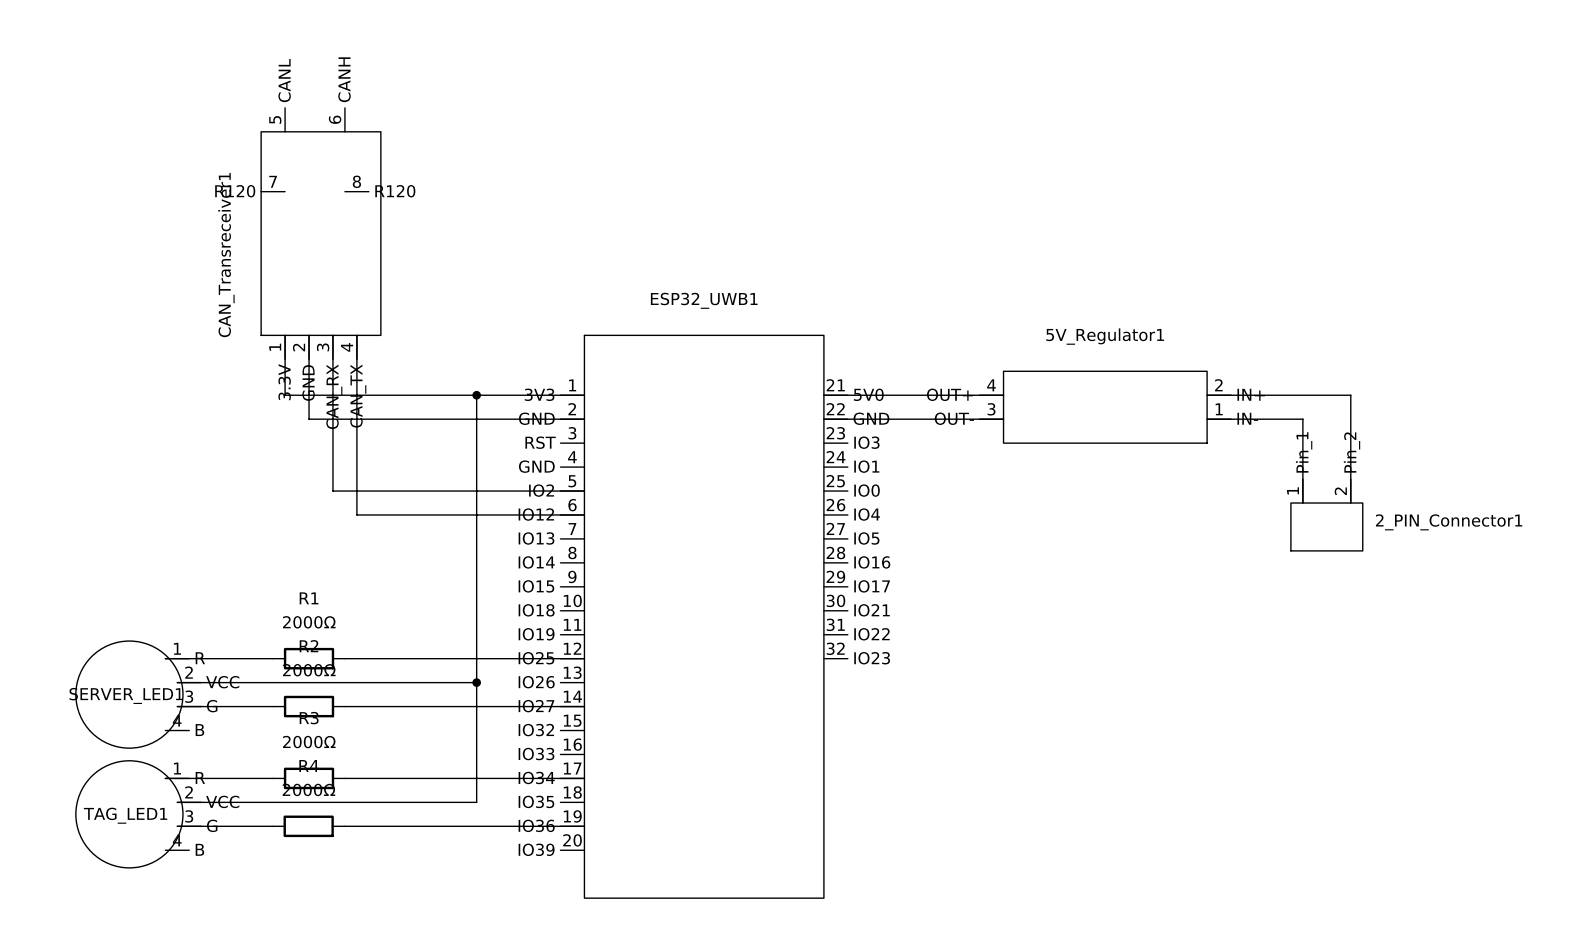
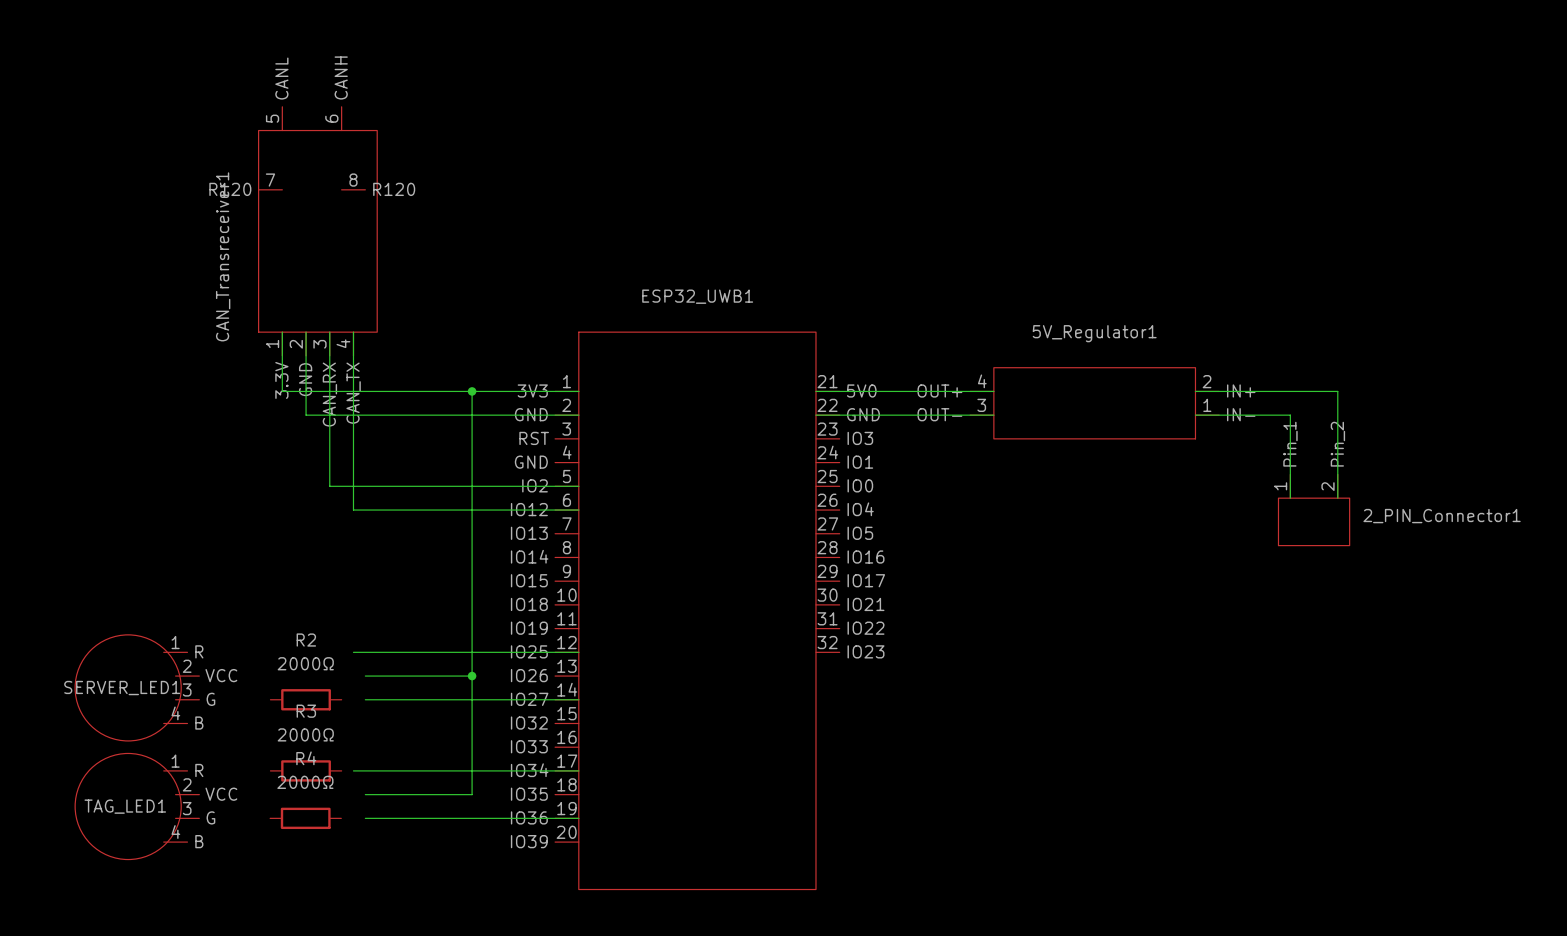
wire: (165, 658) (273, 658) -> none
R1: 2000Ω (309, 658) -> none
wire: (344, 658) (356, 658) -> none
wire: (177, 682) (368, 682) -> none
wire: (177, 706) (273, 706) -> none
wire: (344, 706) (368, 706) -> none
wire: (165, 778) (273, 778) -> none
wire: (344, 778) (356, 778) -> none
wire: (177, 802) (368, 802) -> none
wire: (177, 826) (272, 826) -> none
wire: (344, 826) (368, 826) -> none

